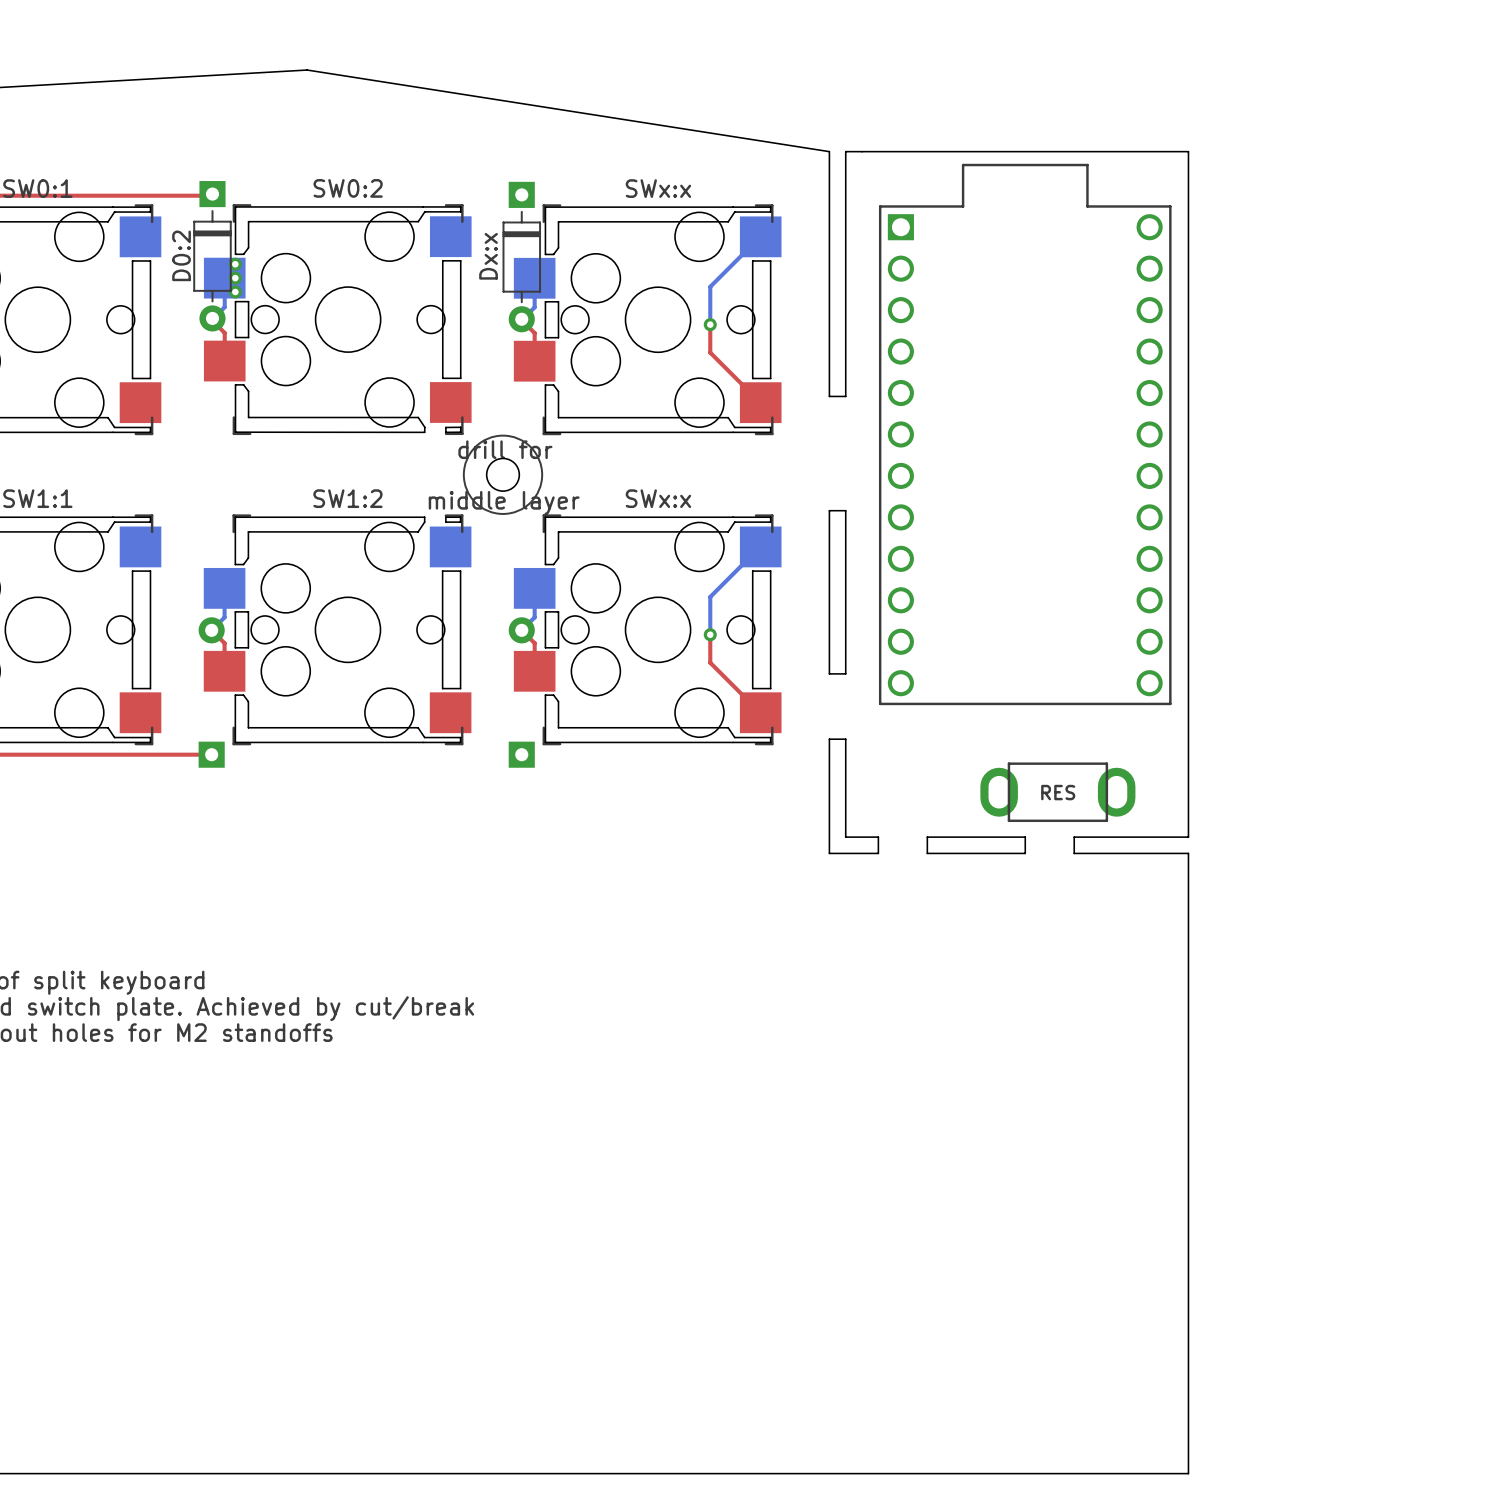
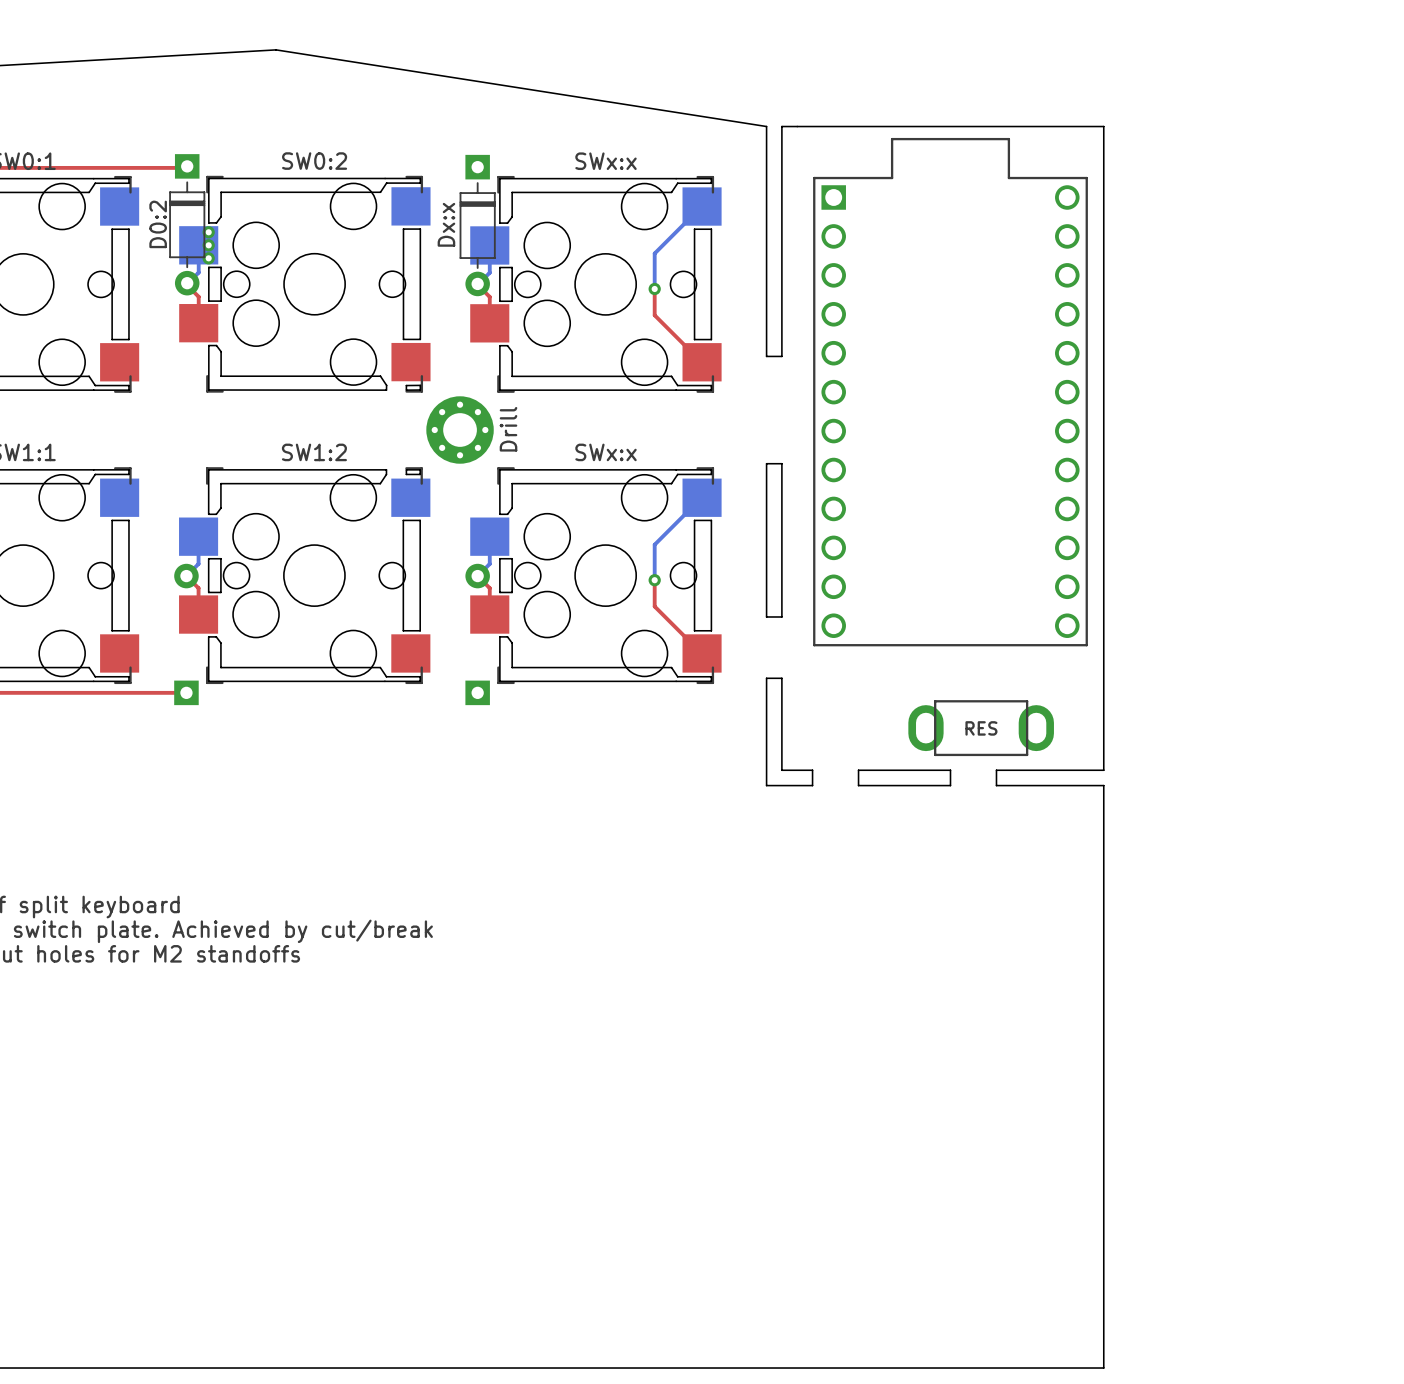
drawing: [462, 434, 544, 515] -> none
text: drill for (505, 449) -> none
round board edge: [486, 458, 520, 492] -> none
Drill: none -> (460, 430)
text: middle layer (504, 503) -> none

